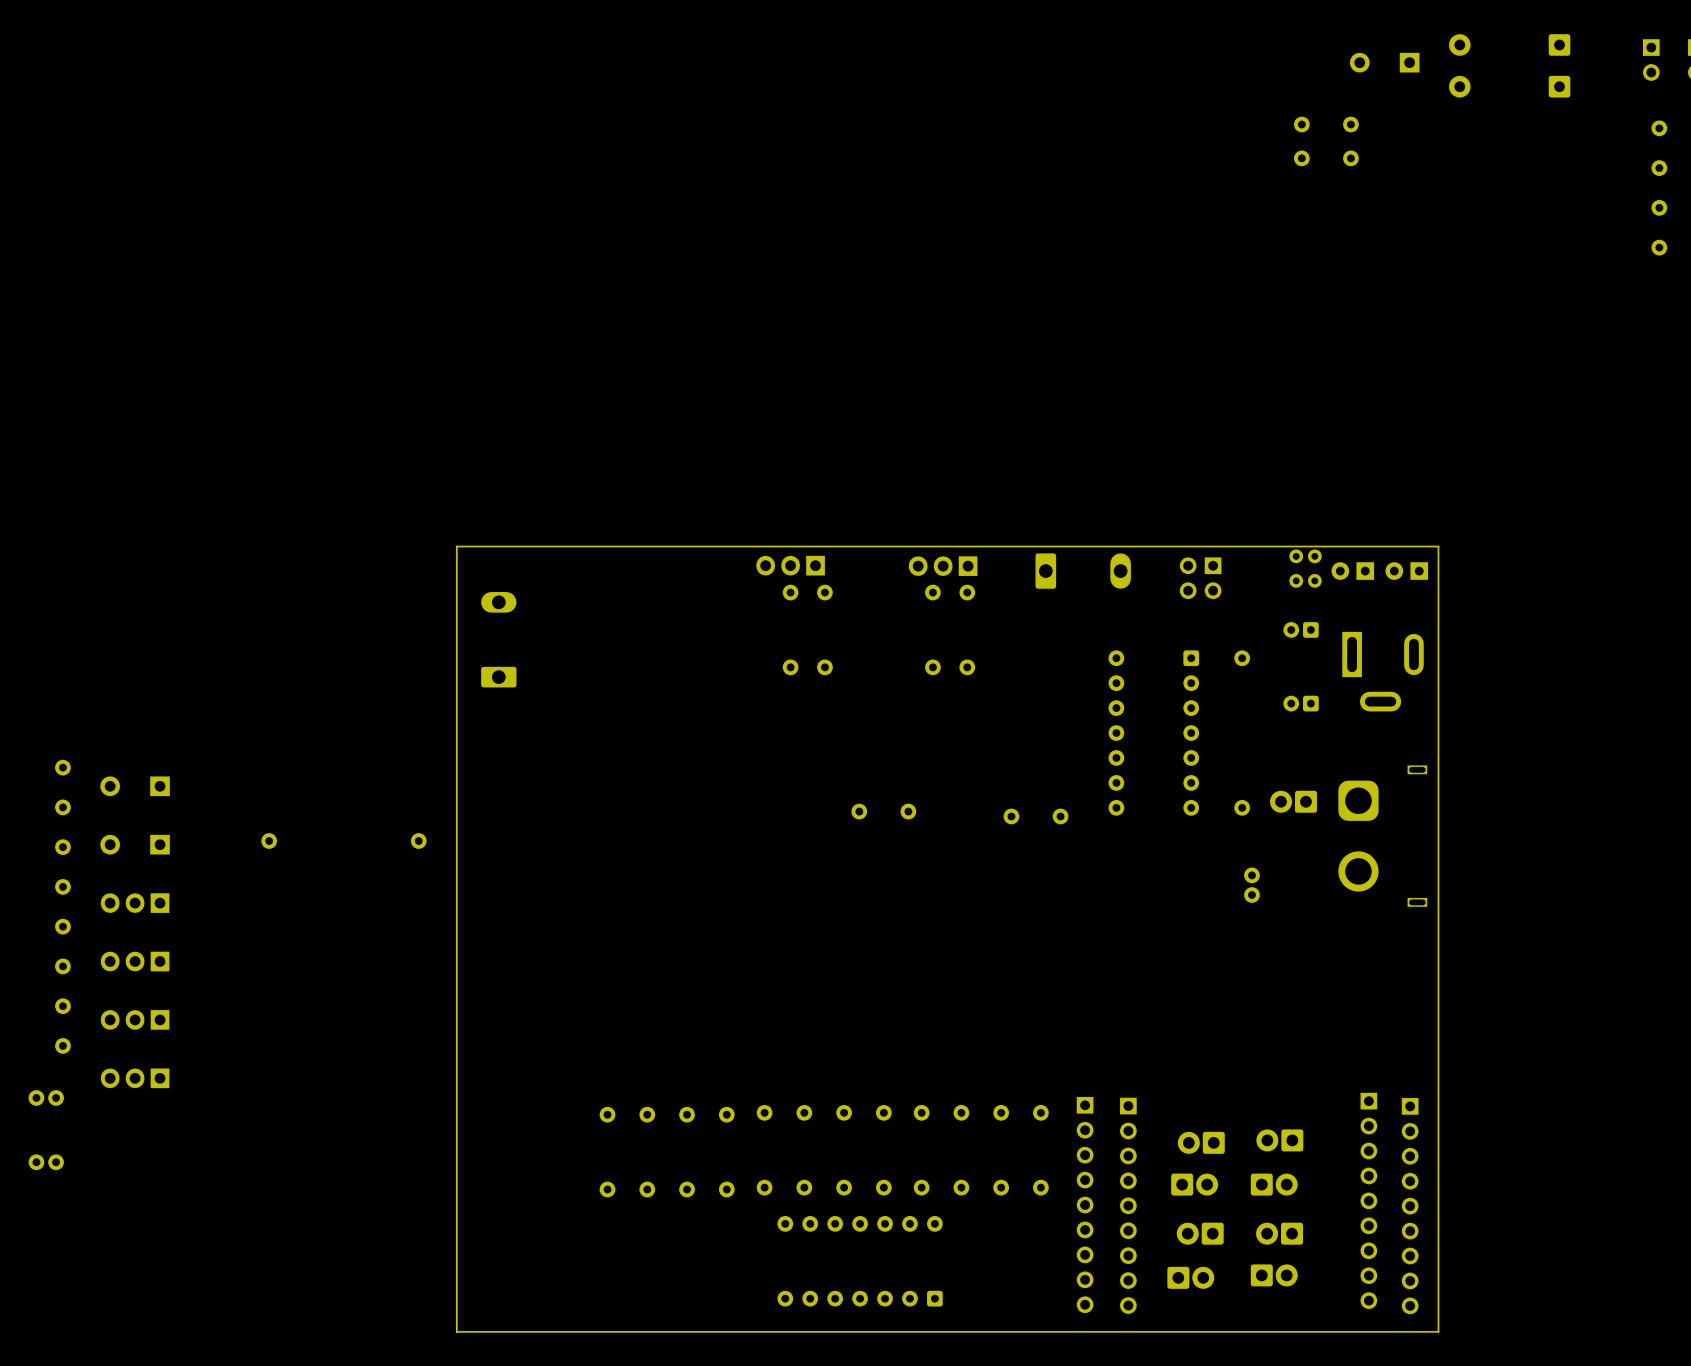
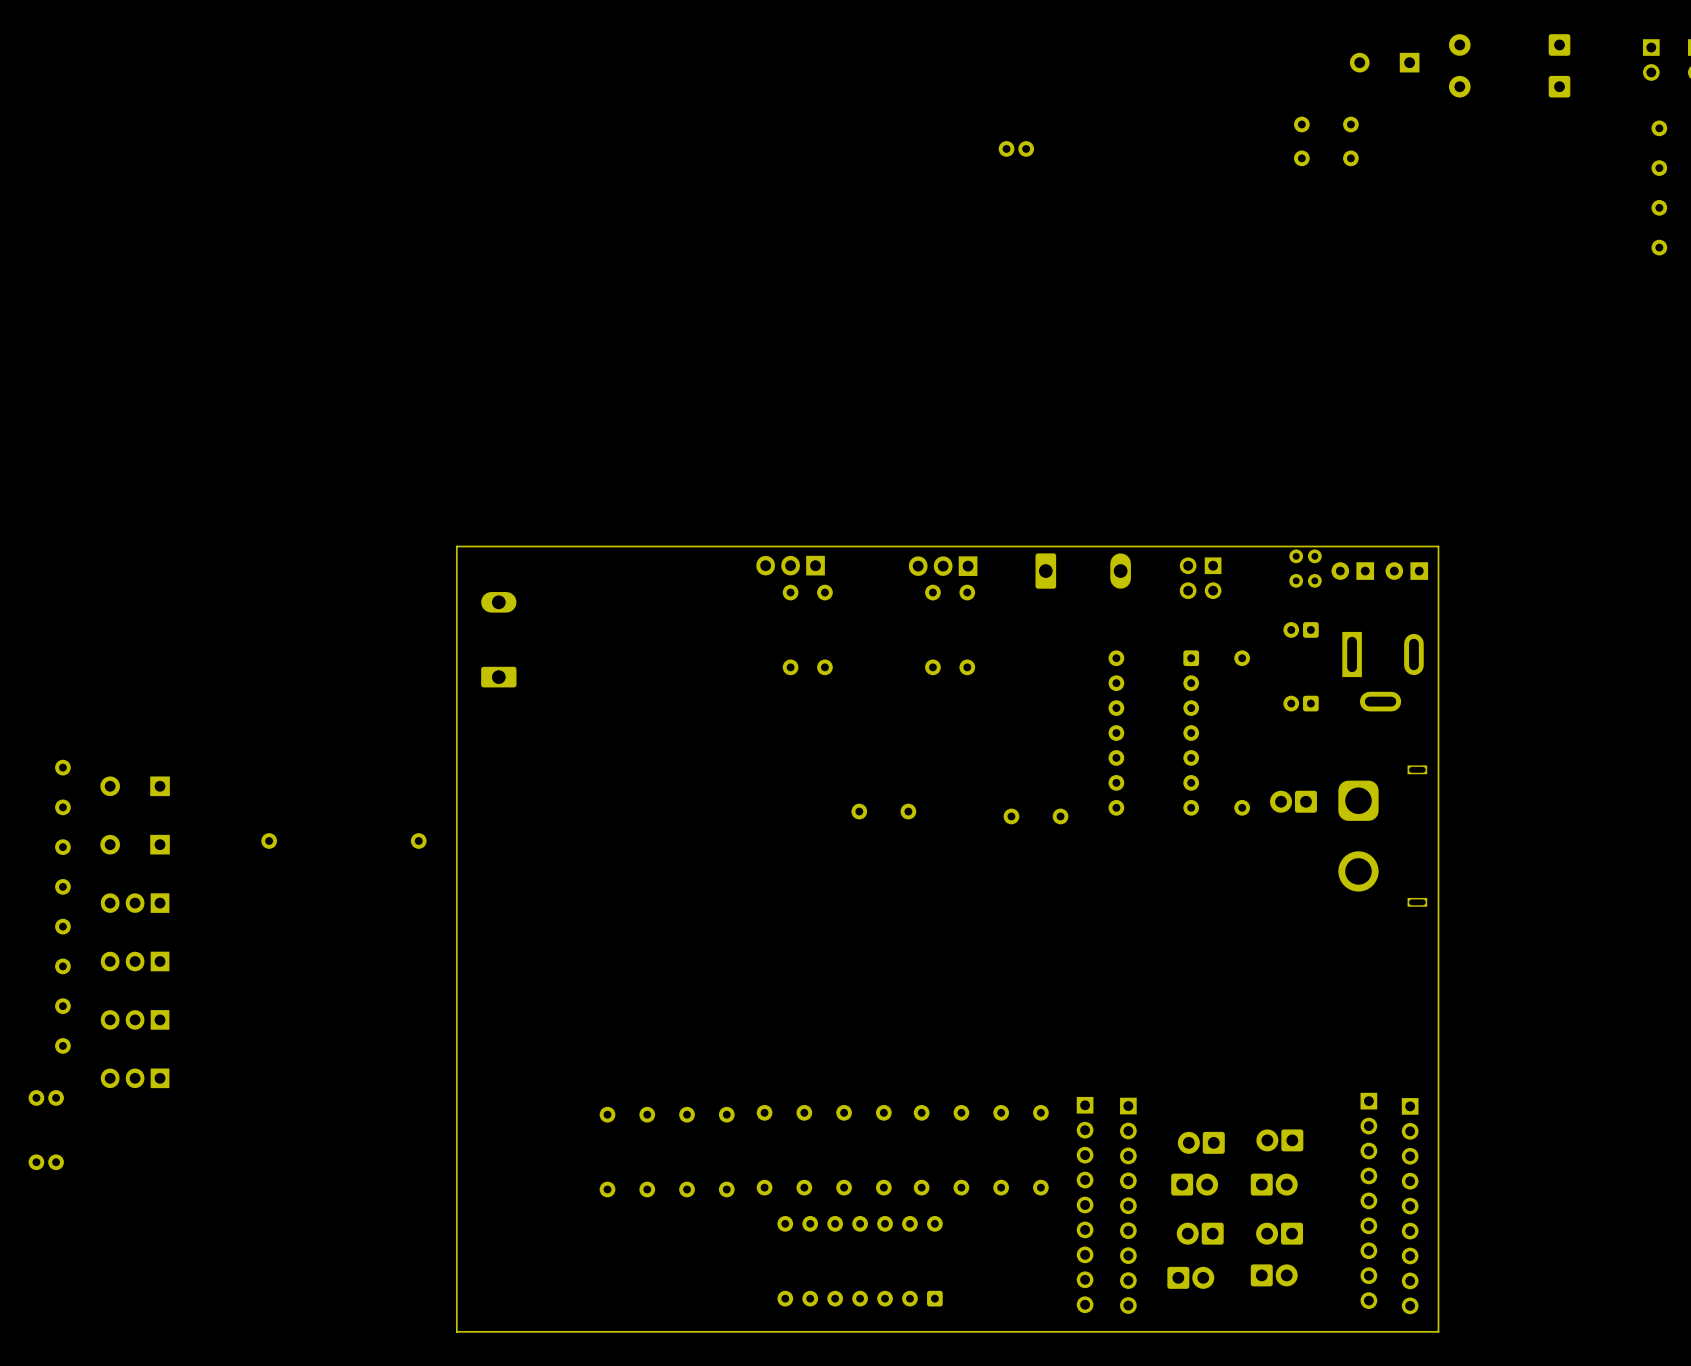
part: none -> (1016, 148)
part: (1251, 885) -> none

